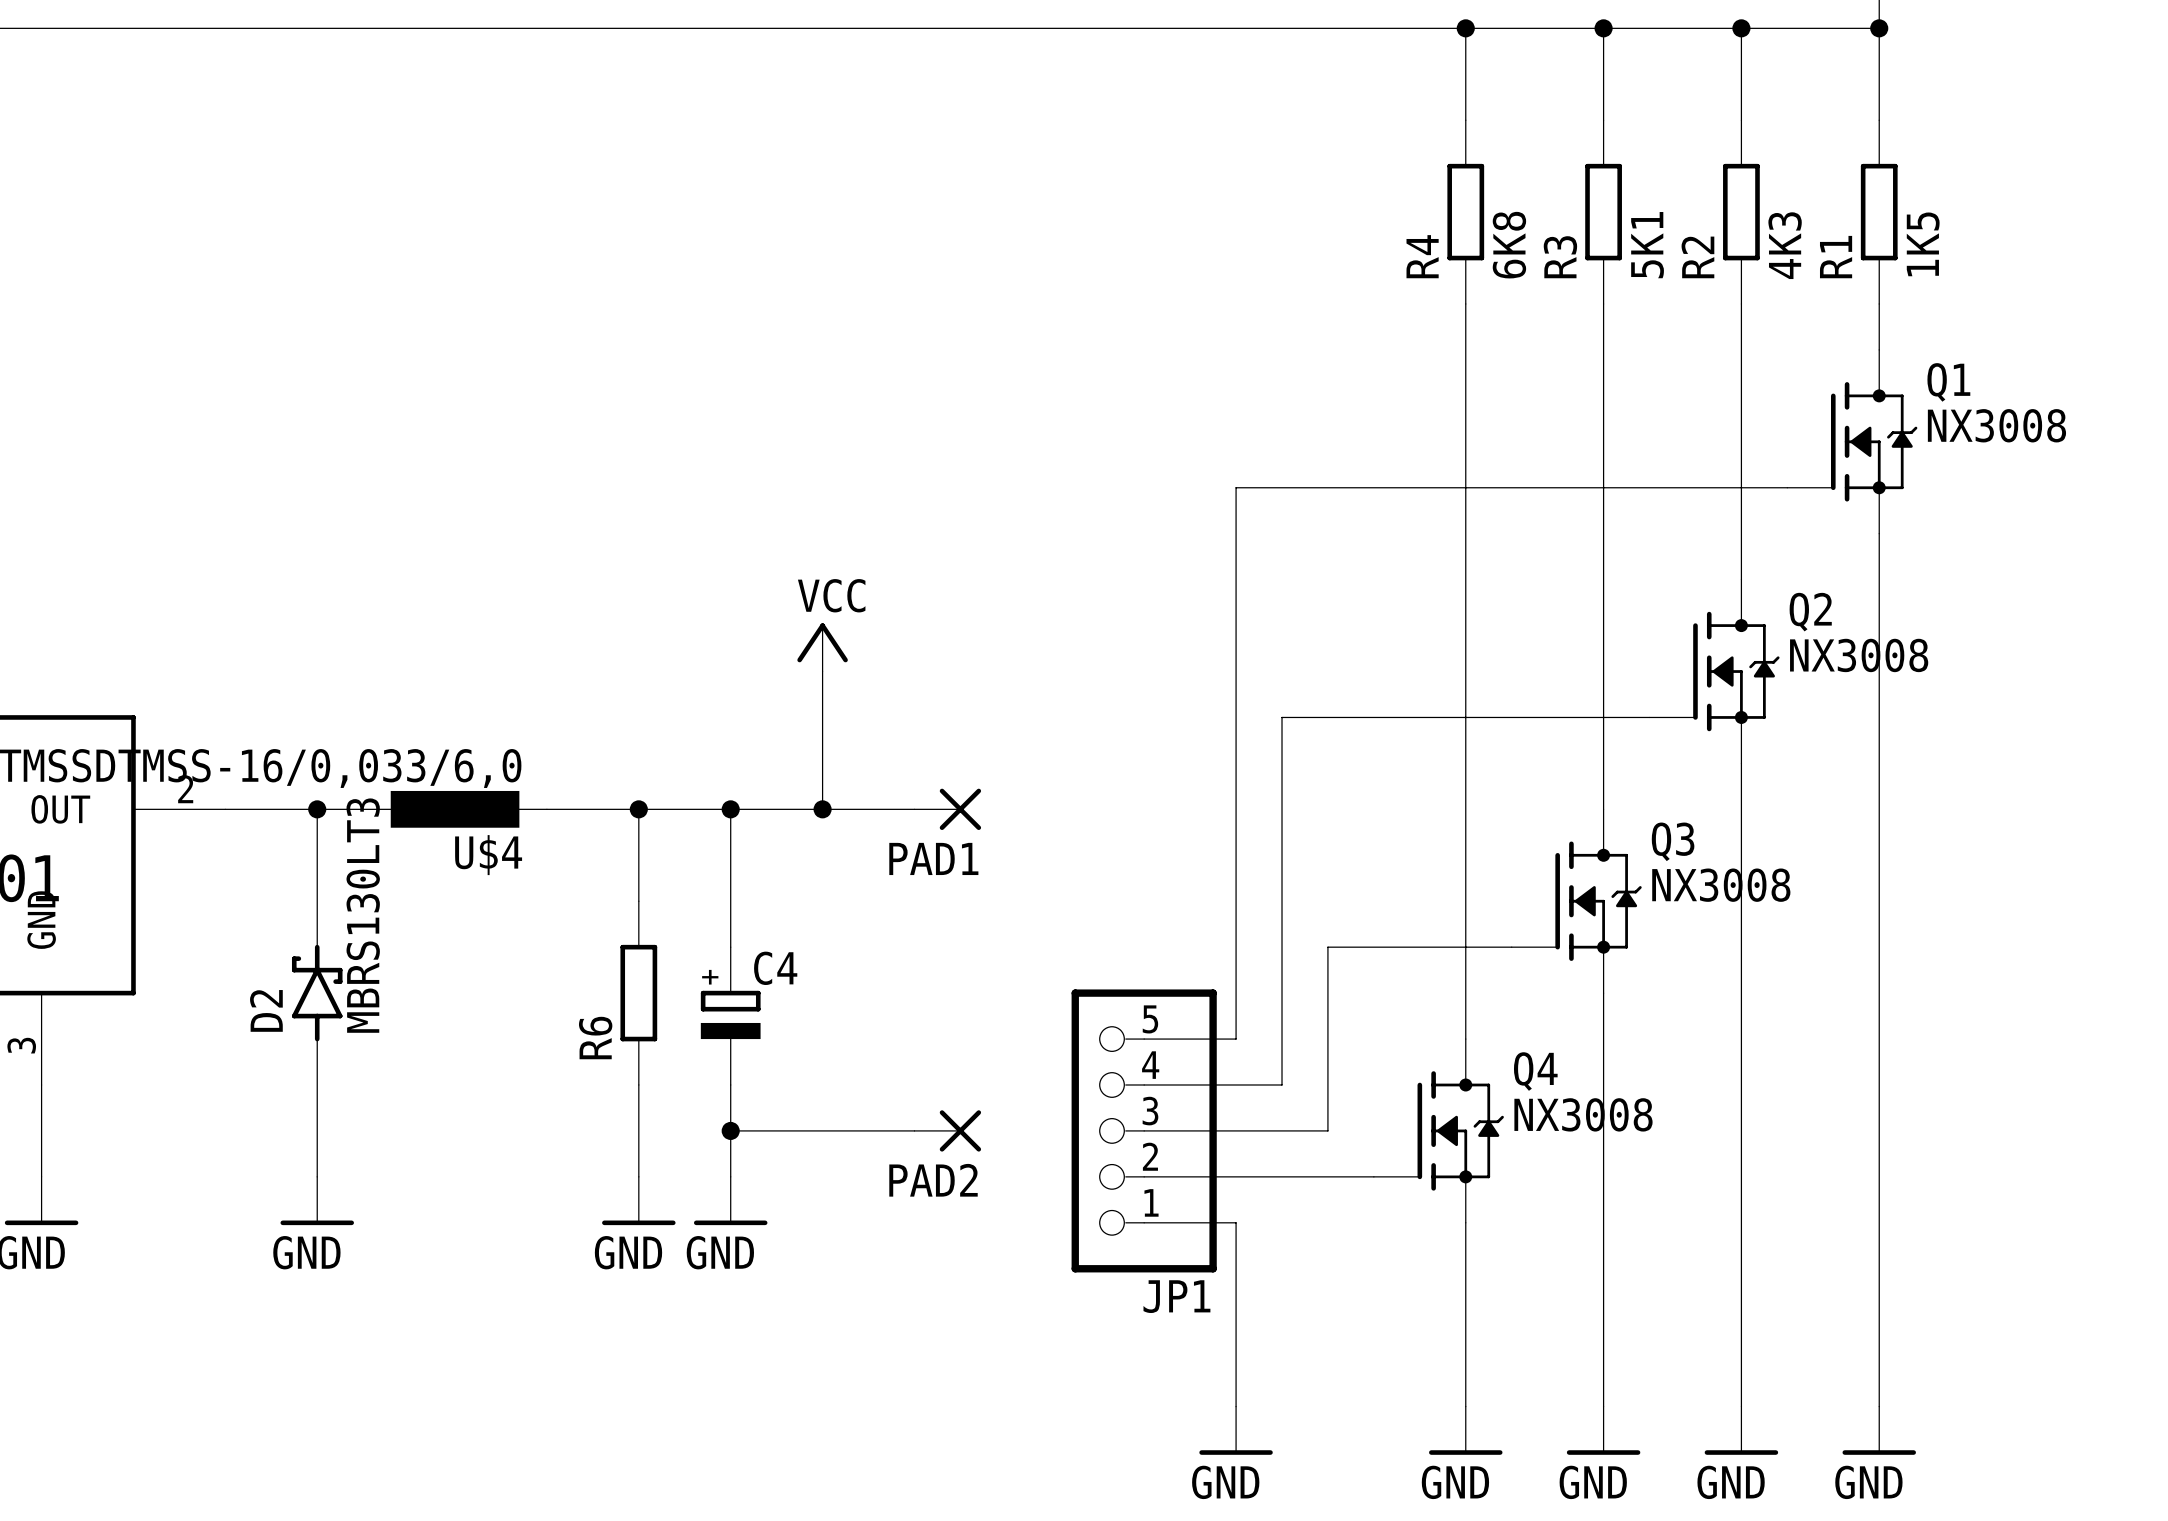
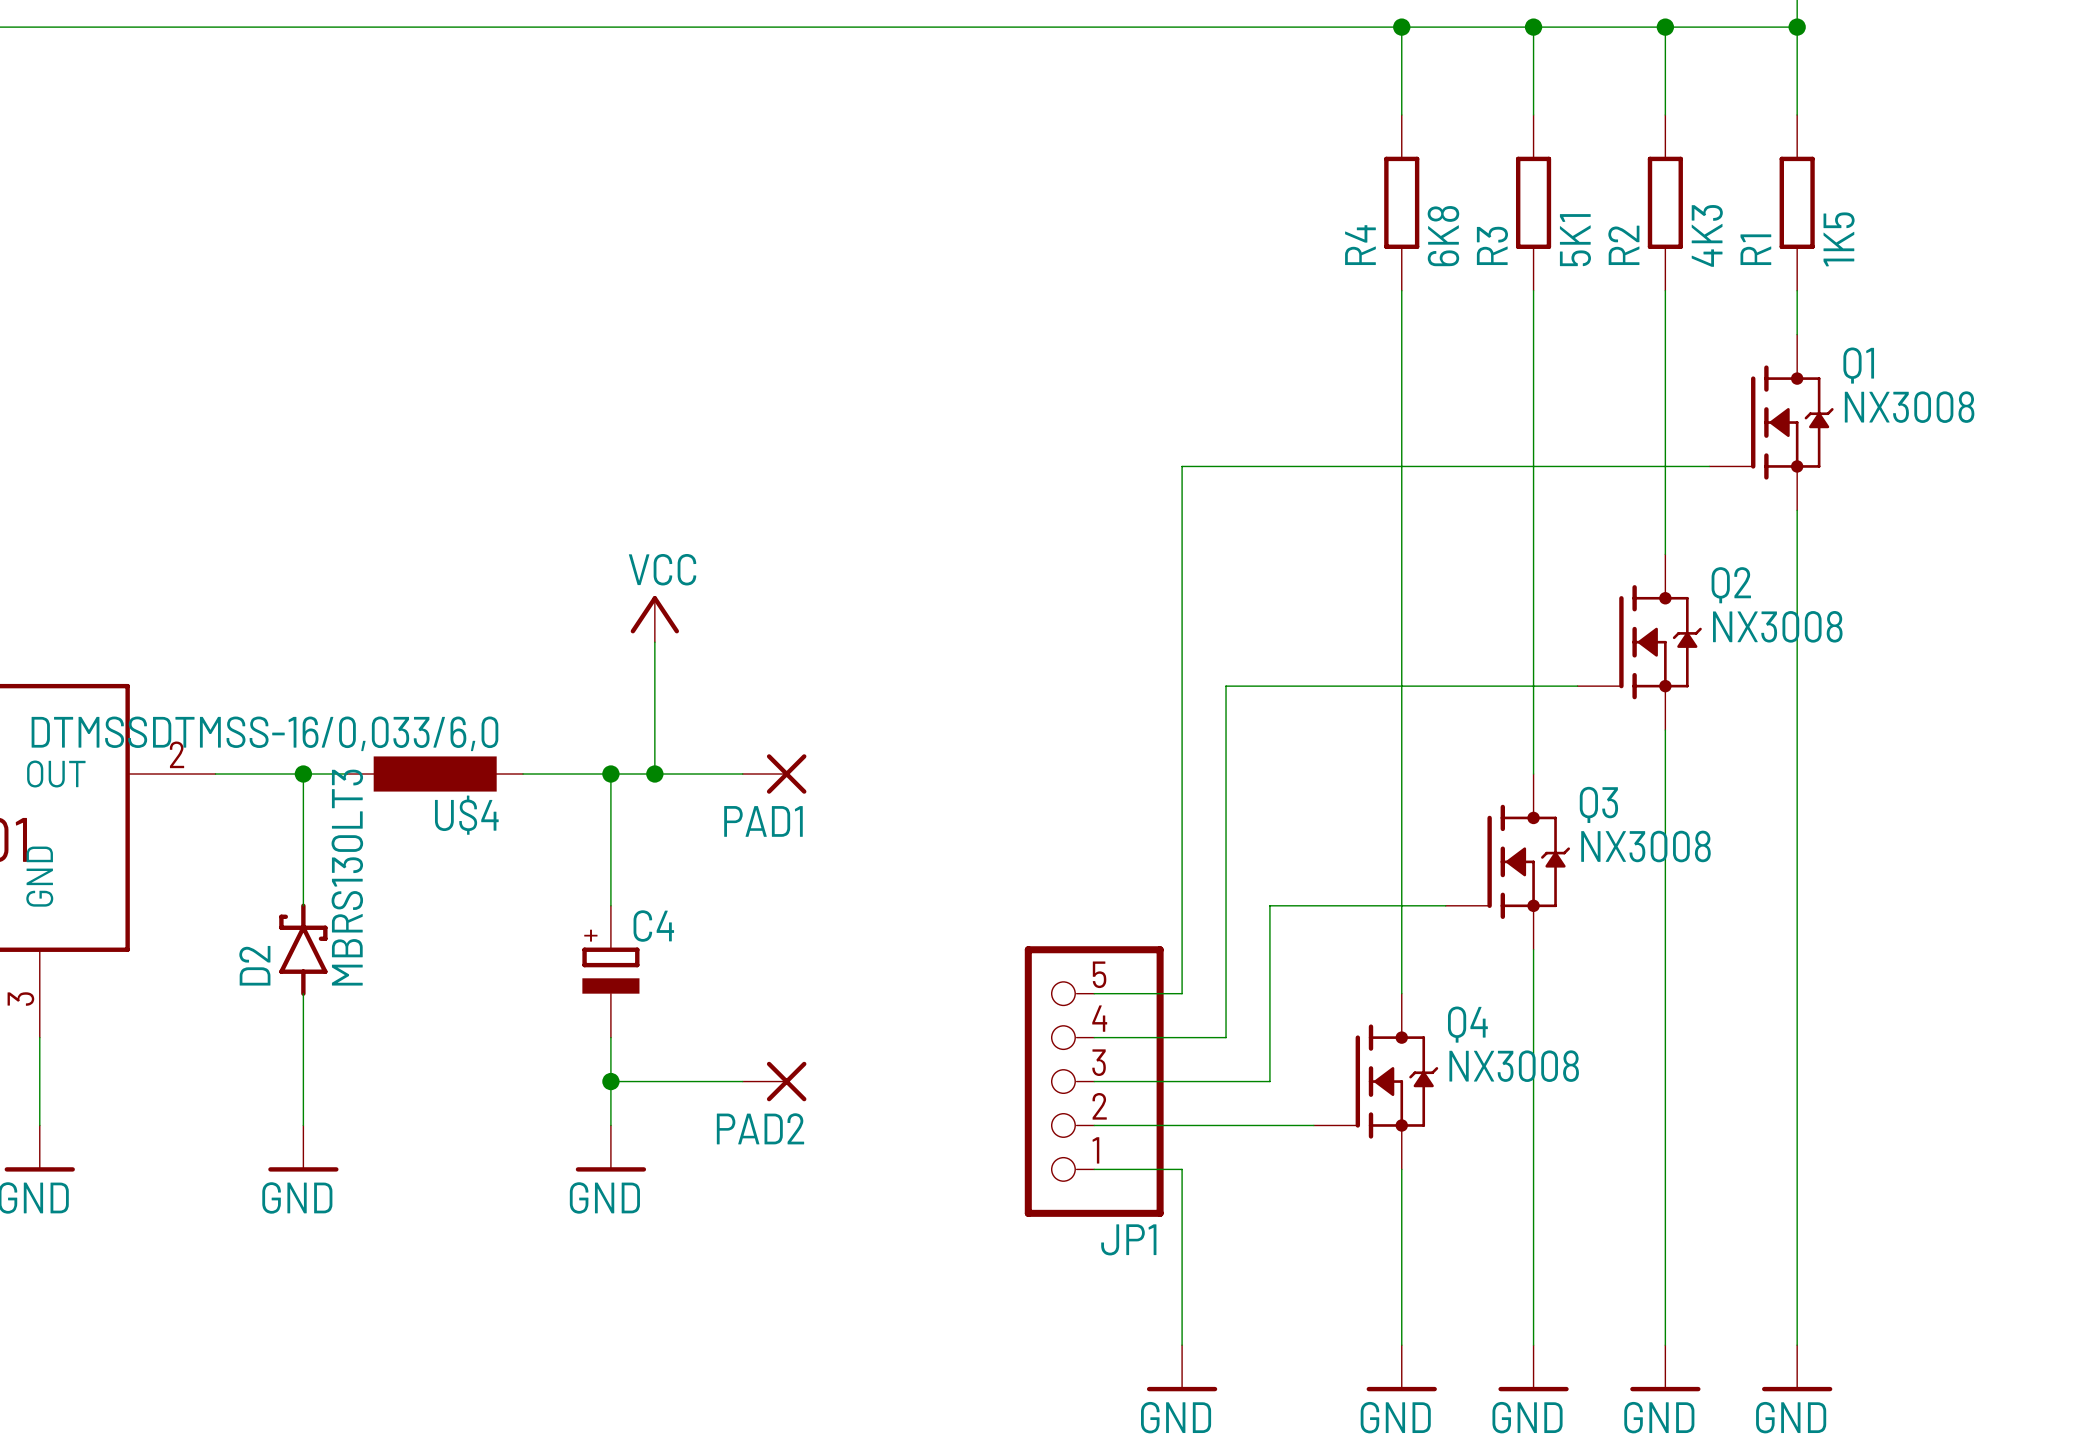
power symbol position: VCC (822, 647) -> VCC (654, 619)
wire: (822, 671) (822, 809) -> (654, 642) (654, 774)
wire: (730, 809) (730, 947) -> none
junction position: (730, 809) -> (654, 774)
wire: (776, 809) (914, 809) -> none
junction: (822, 809) -> none
PAD1 position: (947, 809) -> (774, 774)
R6: (638, 993) -> none
C4 position: (730, 1016) -> (610, 971)
wire: (730, 1084) (730, 1176) -> none
wire: none -> (610, 1081) (698, 1081)
junction position: (730, 1130) -> (610, 1081)
wire: (776, 1130) (914, 1130) -> none
PAD2 position: (947, 1130) -> (774, 1081)
power symbol: GND (730, 1200) -> none

